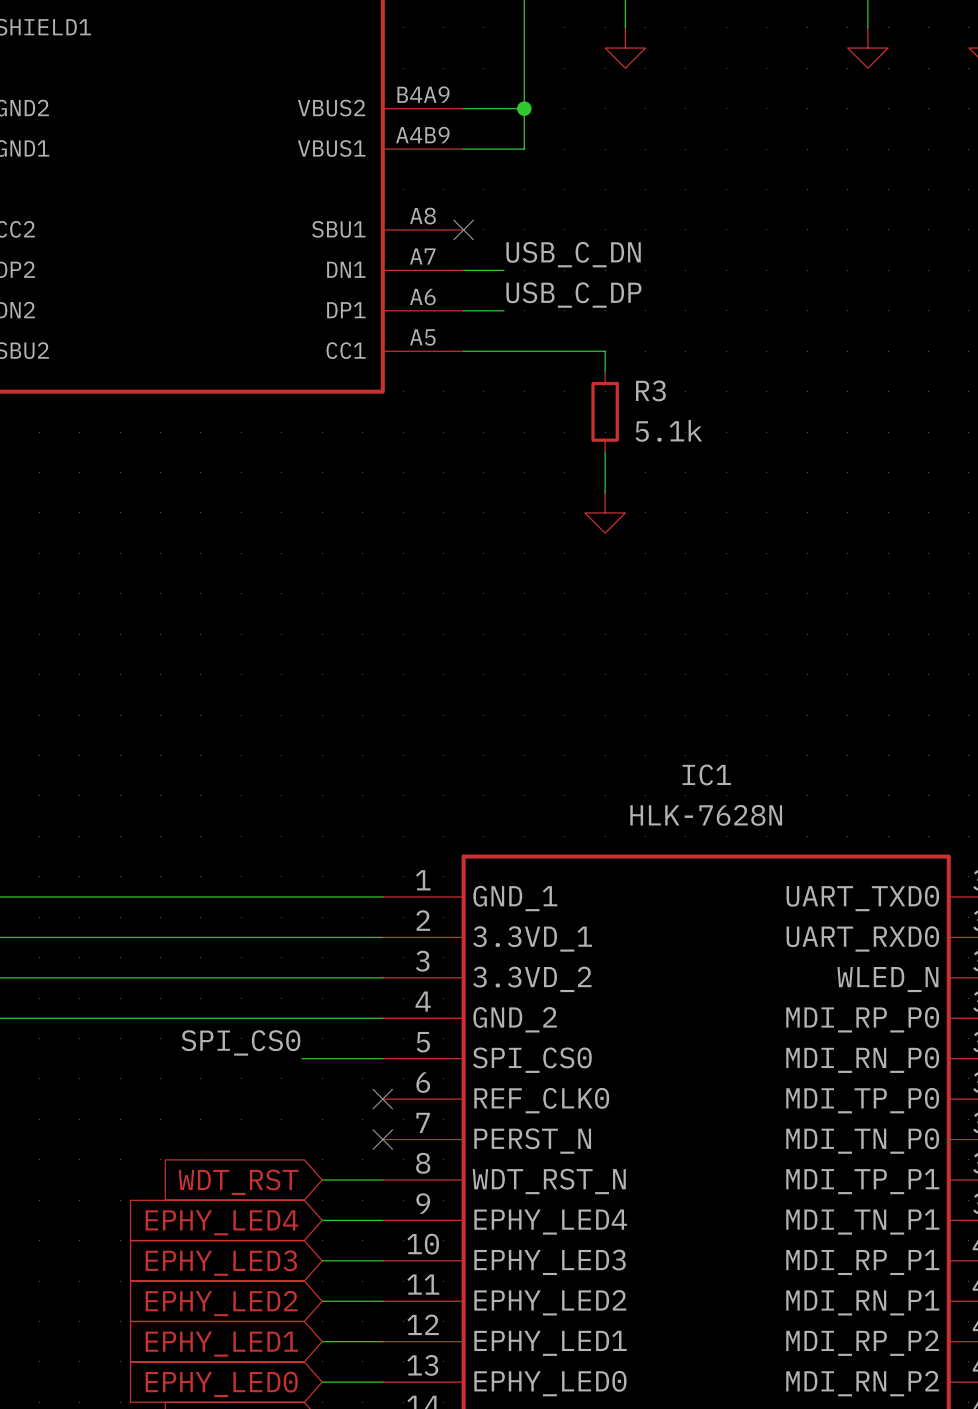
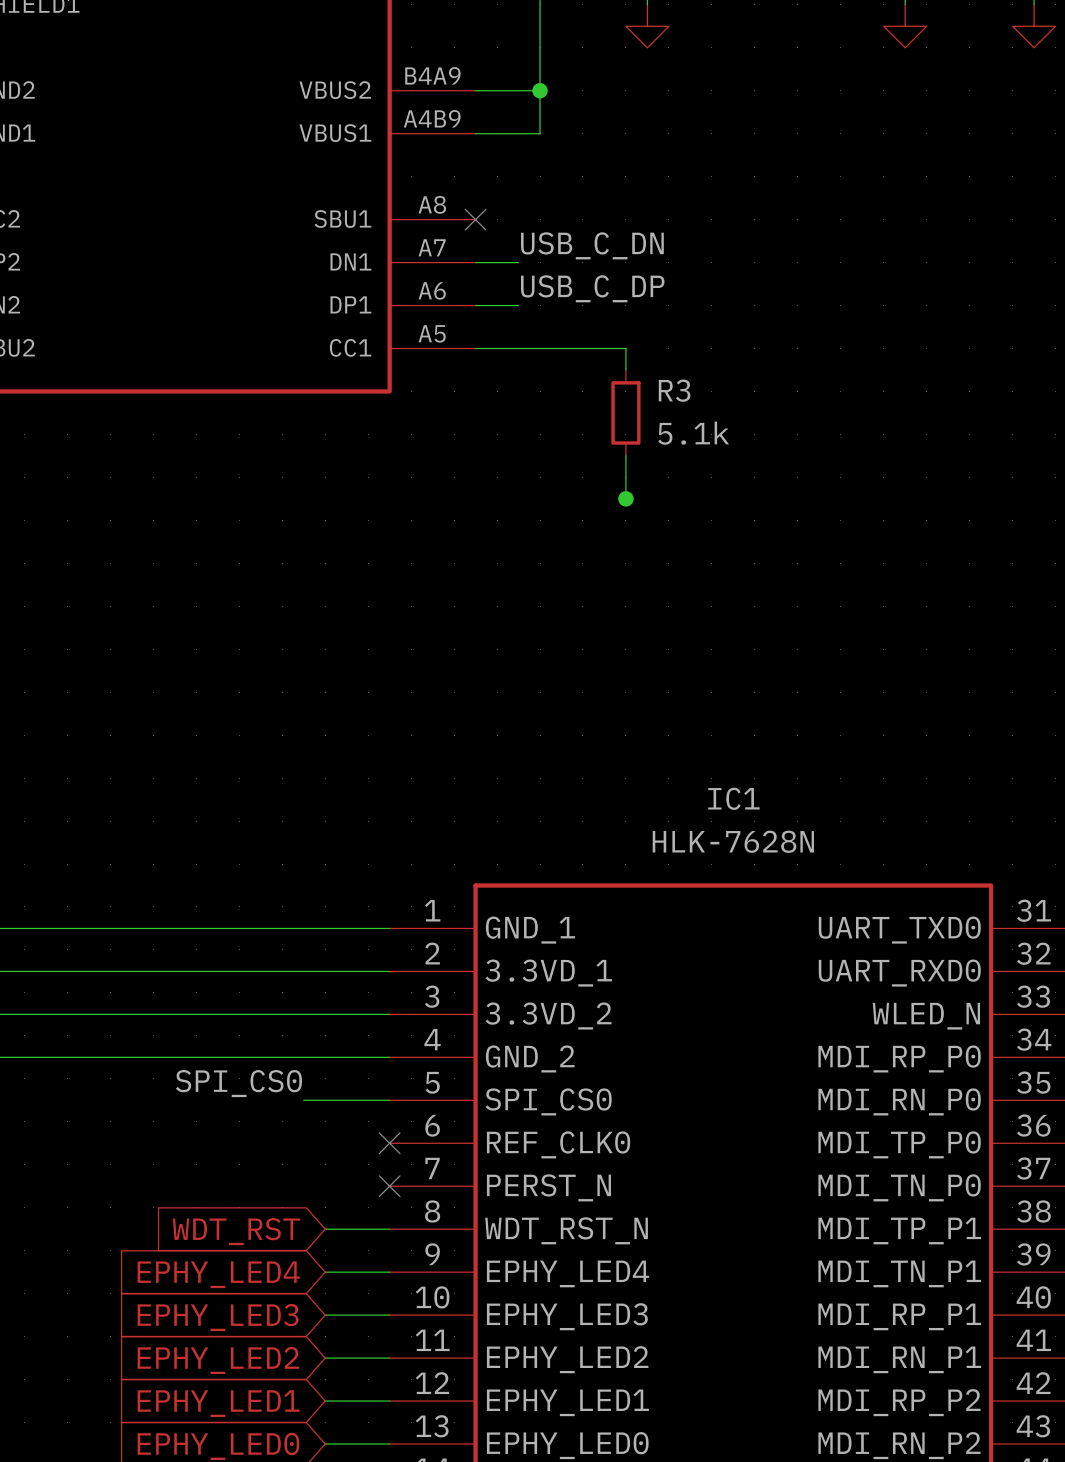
junction: none -> (625, 498)
power symbol: (605, 512) -> none

